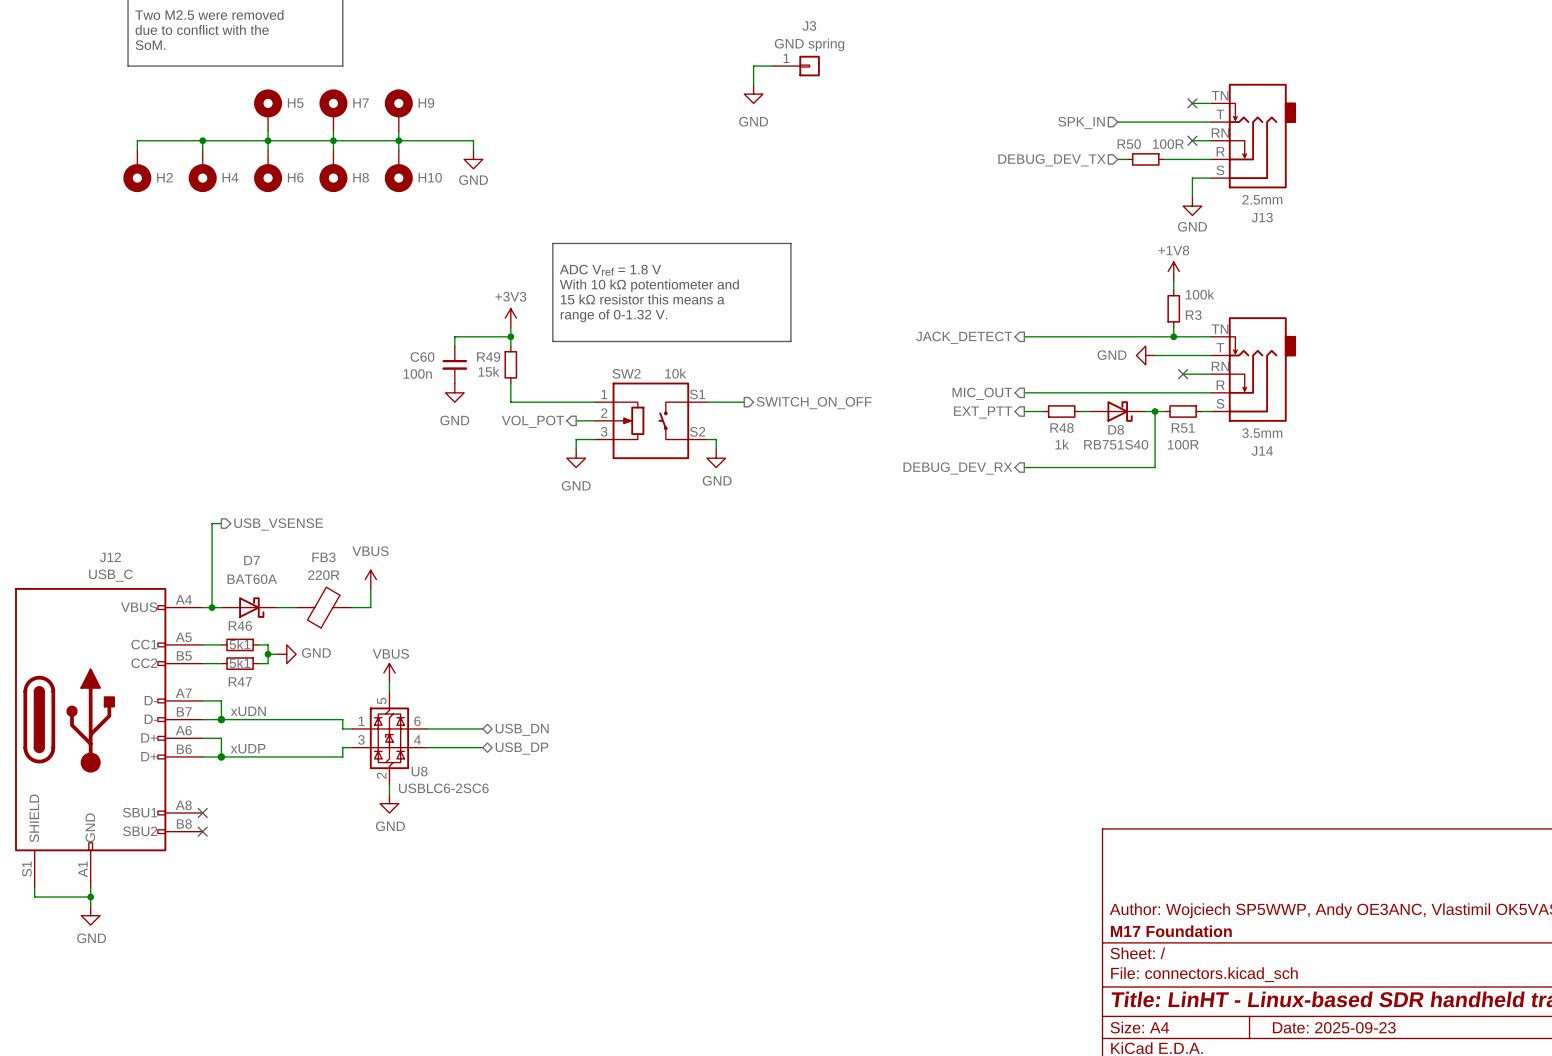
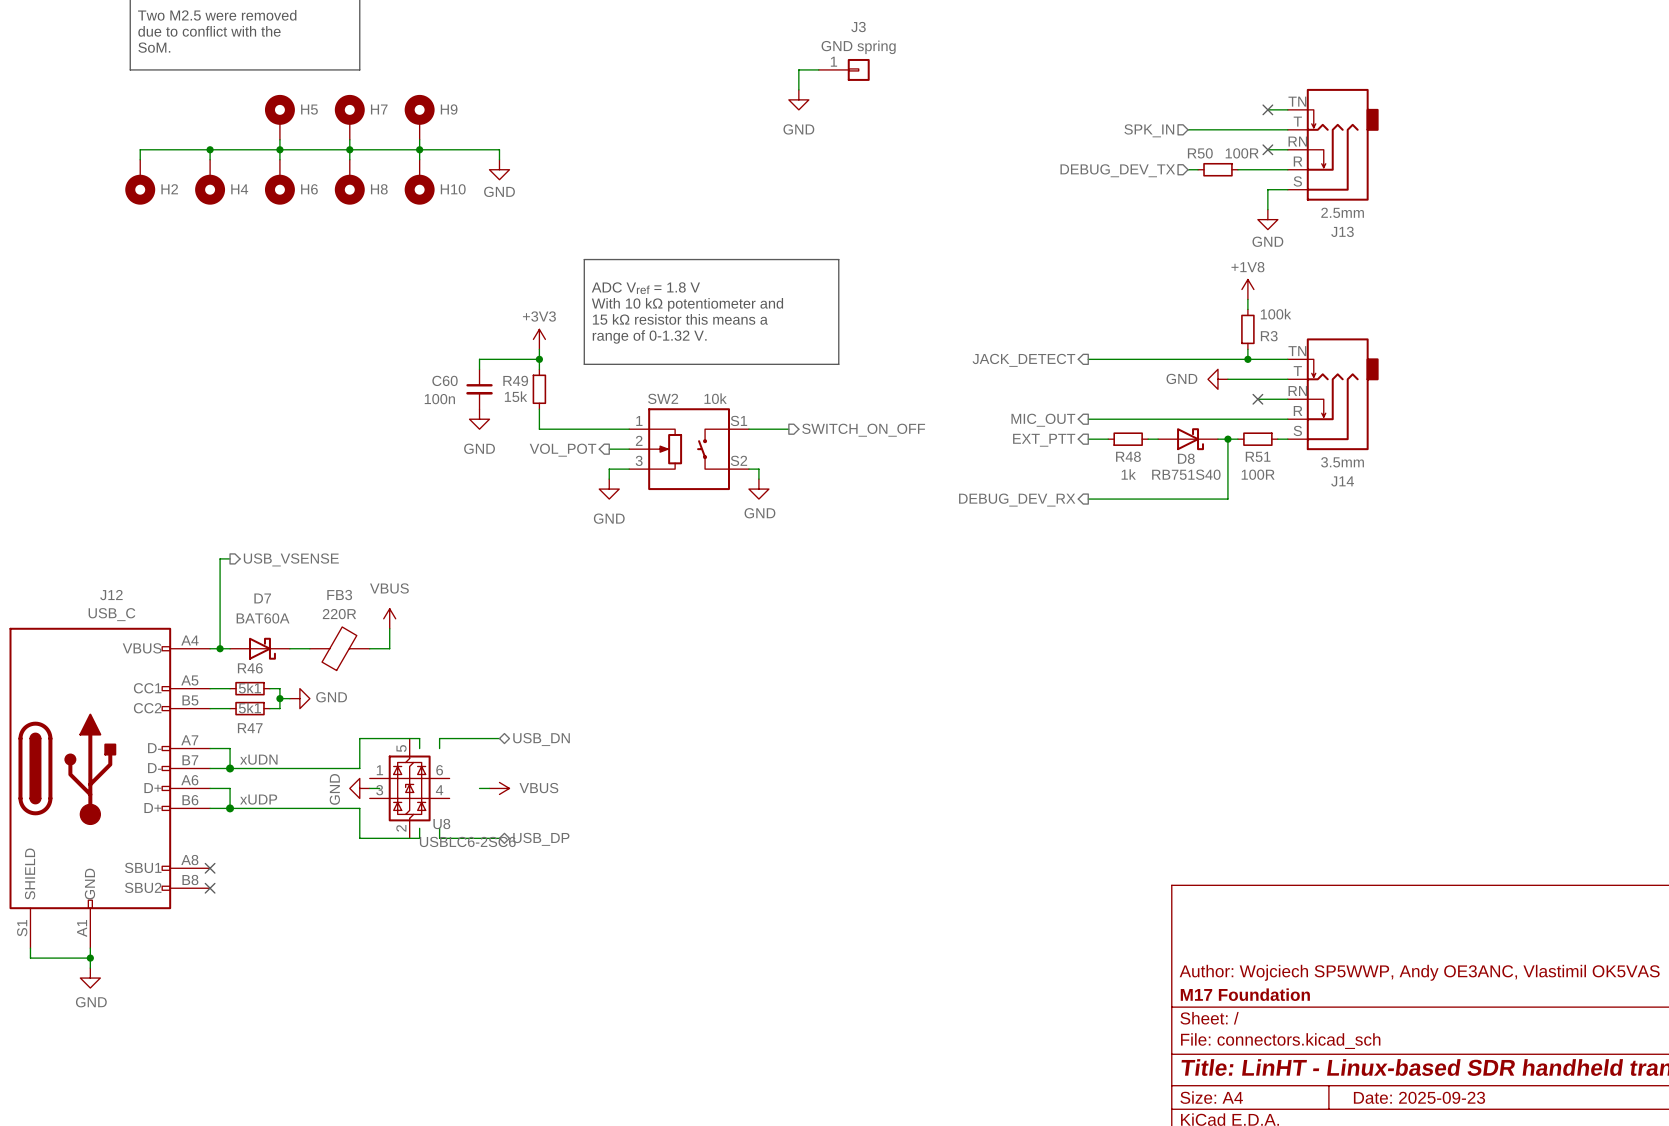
power symbol text position: VBUS (390, 653) -> VBUS (538, 788)
power symbol rotation: 0° (389, 672) -> 90° clockwise (499, 788)
power symbol position: VBUS (389, 672) -> VBUS (499, 788)
wire: (389, 682) (389, 691) -> none
wire: none -> (499, 738) (439, 738) (439, 748)
wire: (342, 719) (342, 728) (352, 728) -> (359, 768) (359, 738) (419, 738) (419, 748)
wire: (426, 728) (482, 728) -> none
hierarchical label position: USB_DN (522, 729) -> USB_DN (541, 739)
wire: none -> (369, 788) (379, 788)
wire: none -> (479, 788) (489, 788)
wire: (352, 747) (342, 747) (342, 756) -> (419, 828) (419, 838) (359, 838) (359, 808)
wire: (426, 747) (482, 747) -> none
hierarchical label position: USB_DP (522, 748) -> USB_DP (541, 839)
wire: none -> (439, 828) (439, 838) (499, 838)
wire: (389, 784) (389, 794) -> none
power symbol rotation: 0° (389, 803) -> 90° clockwise (359, 788)
power symbol position: GND (389, 803) -> GND (359, 788)

